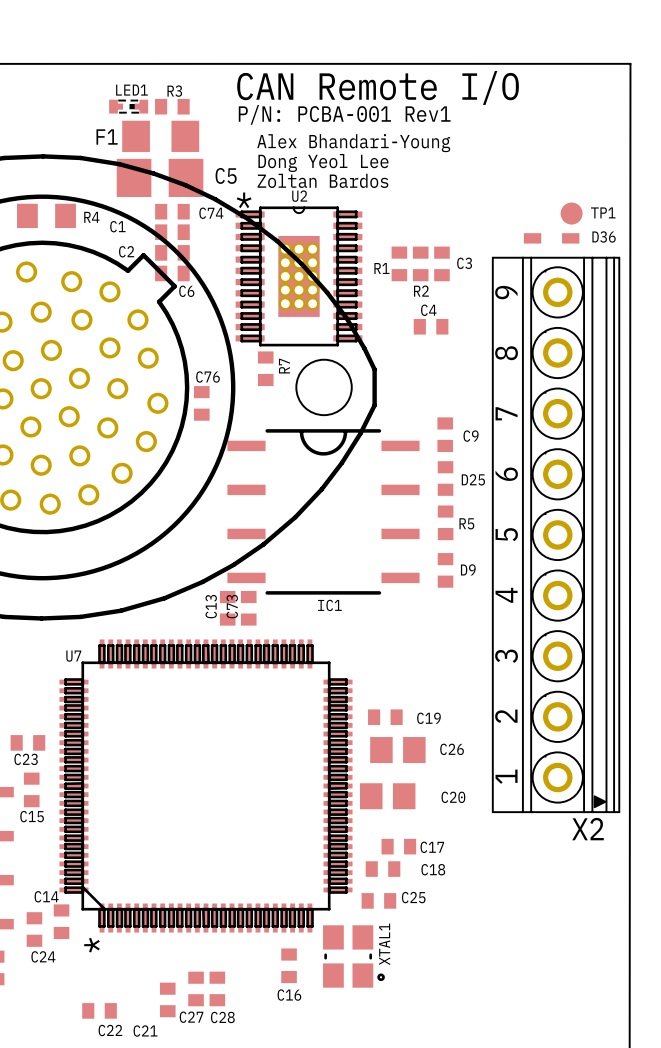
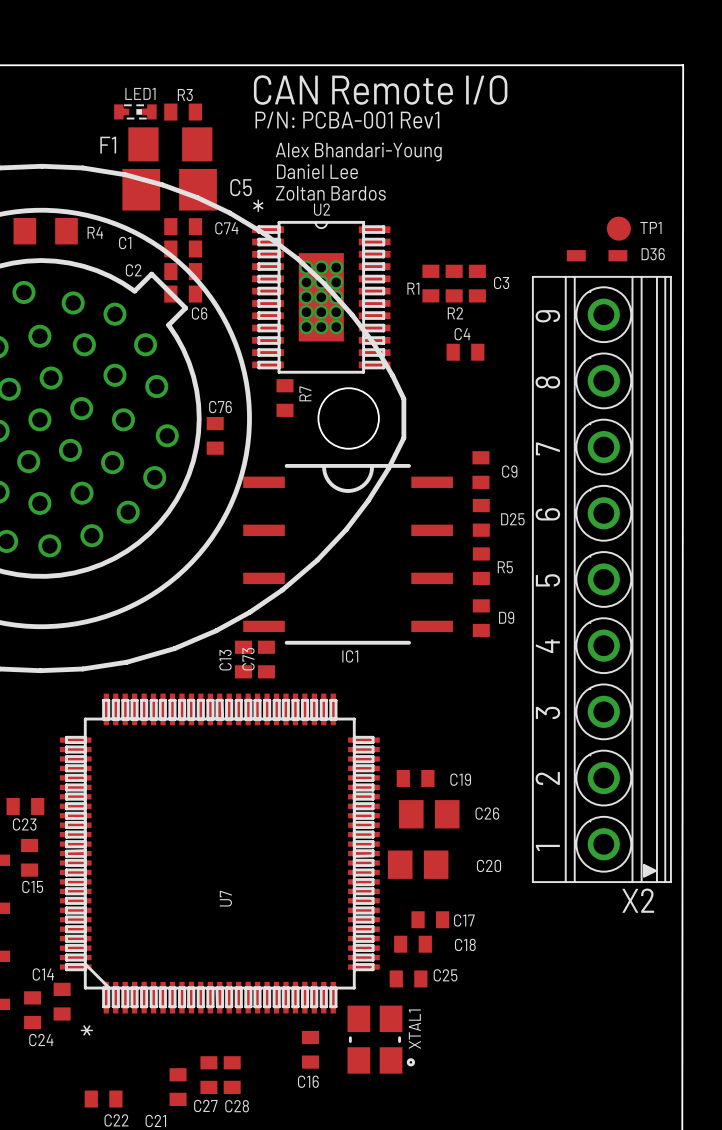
text: Dong Yeol Lee (323, 162) -> Daniel Lee (317, 171)
U7 name rotation: 0° (73, 656) -> 90° counterclockwise (225, 898)
U7 name position: U7 (73, 656) -> U7 (225, 898)

